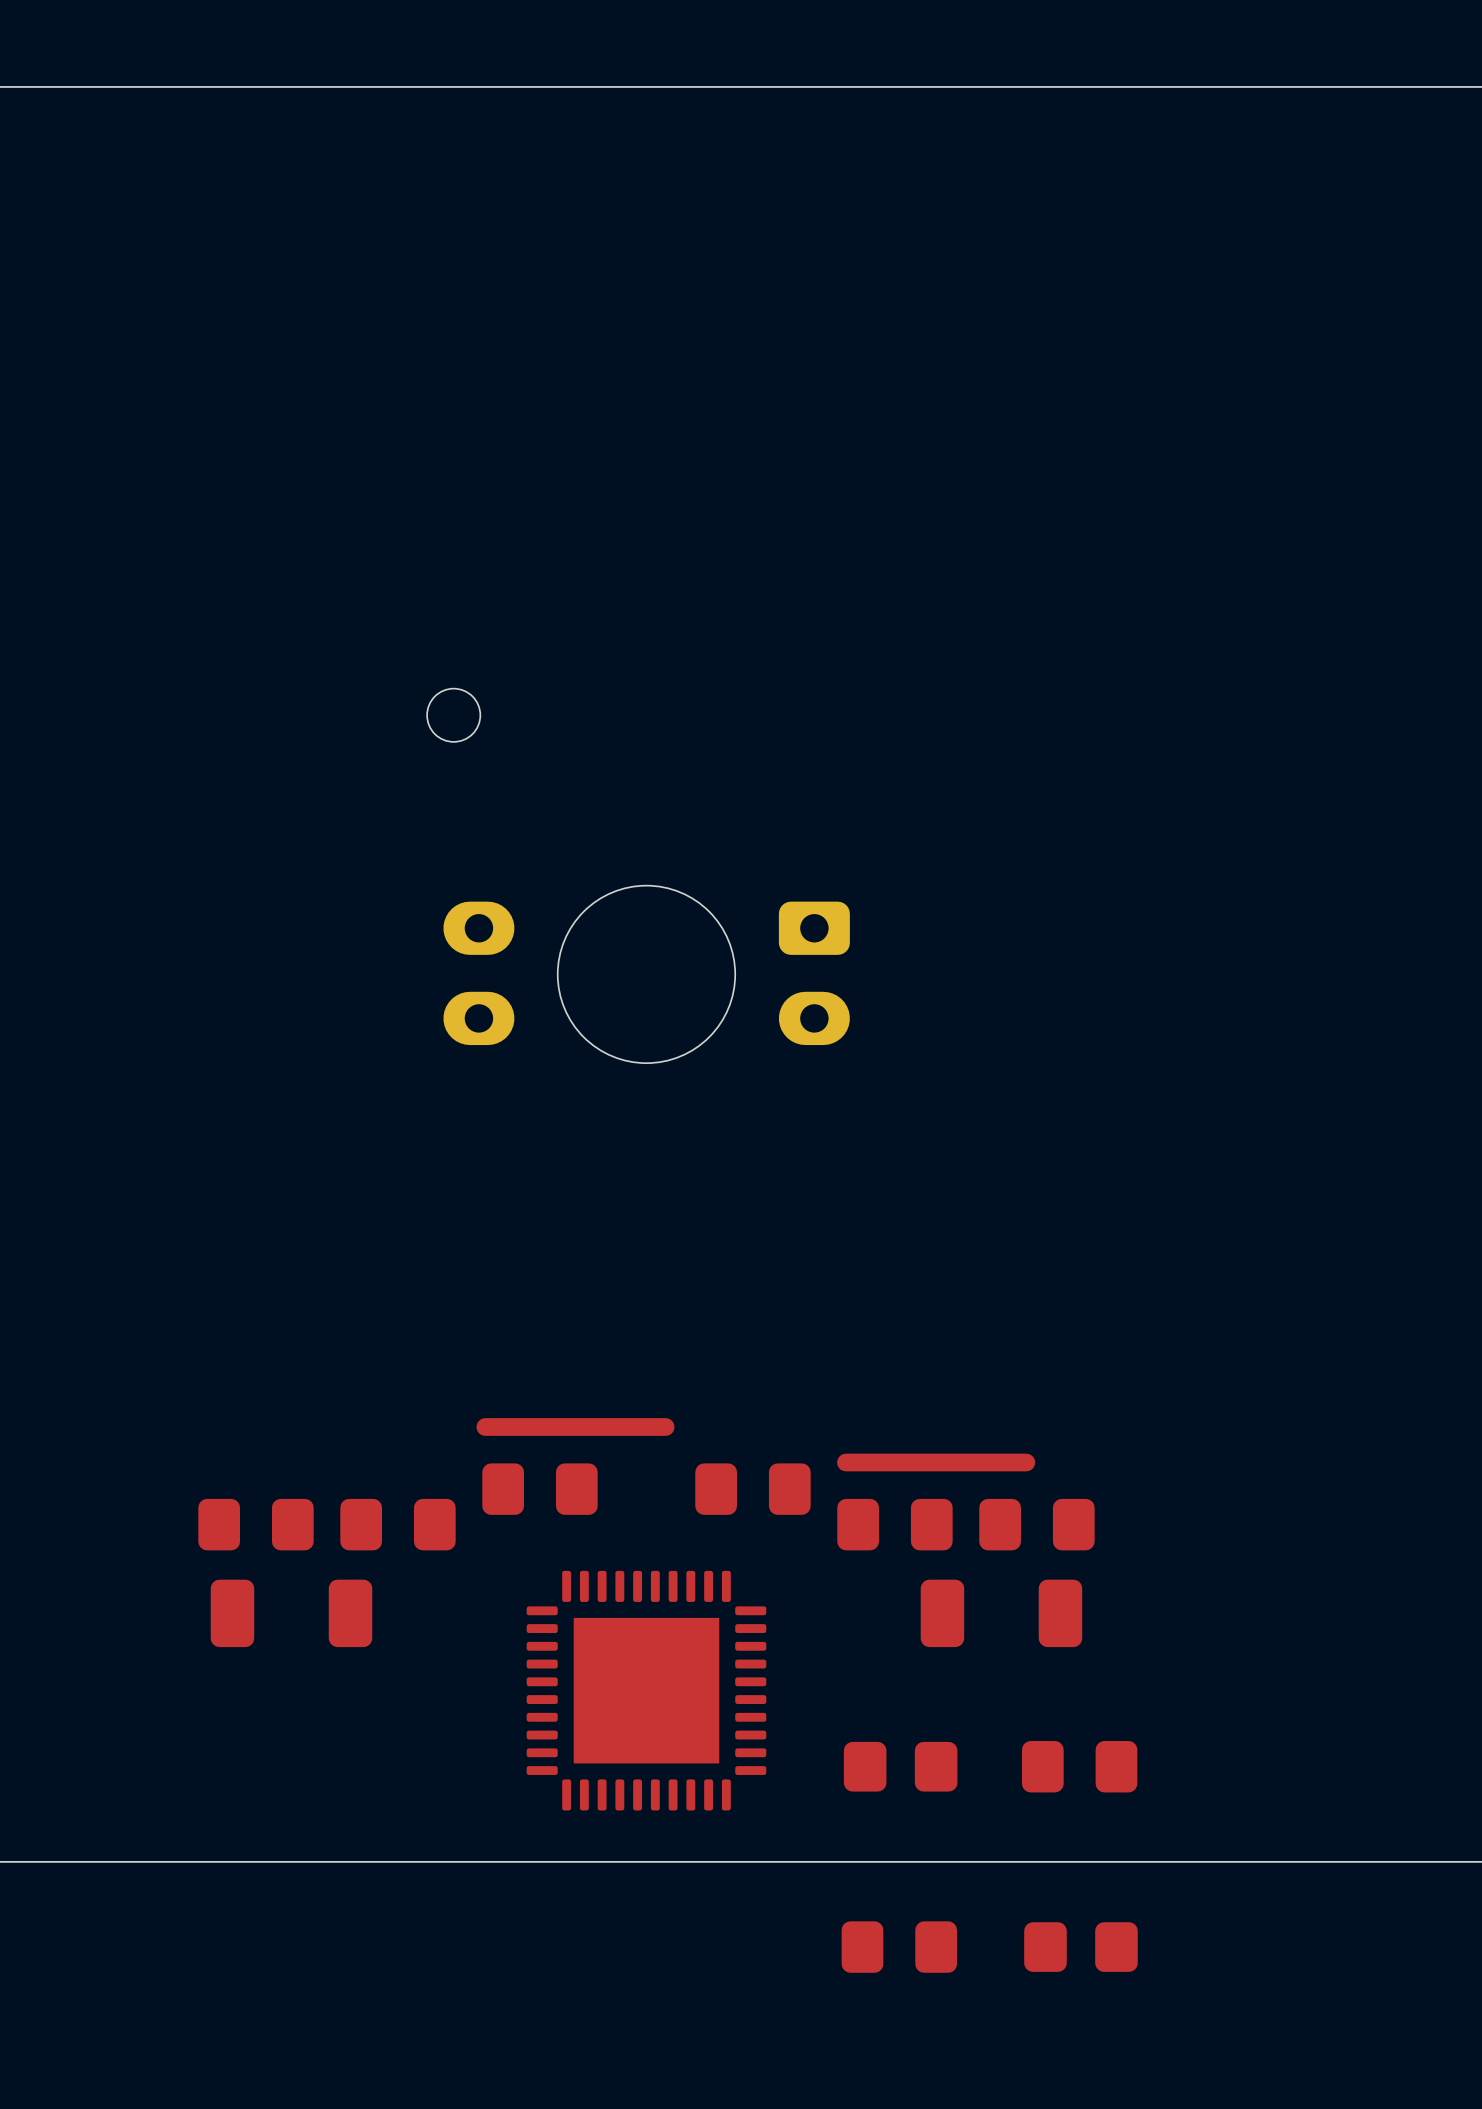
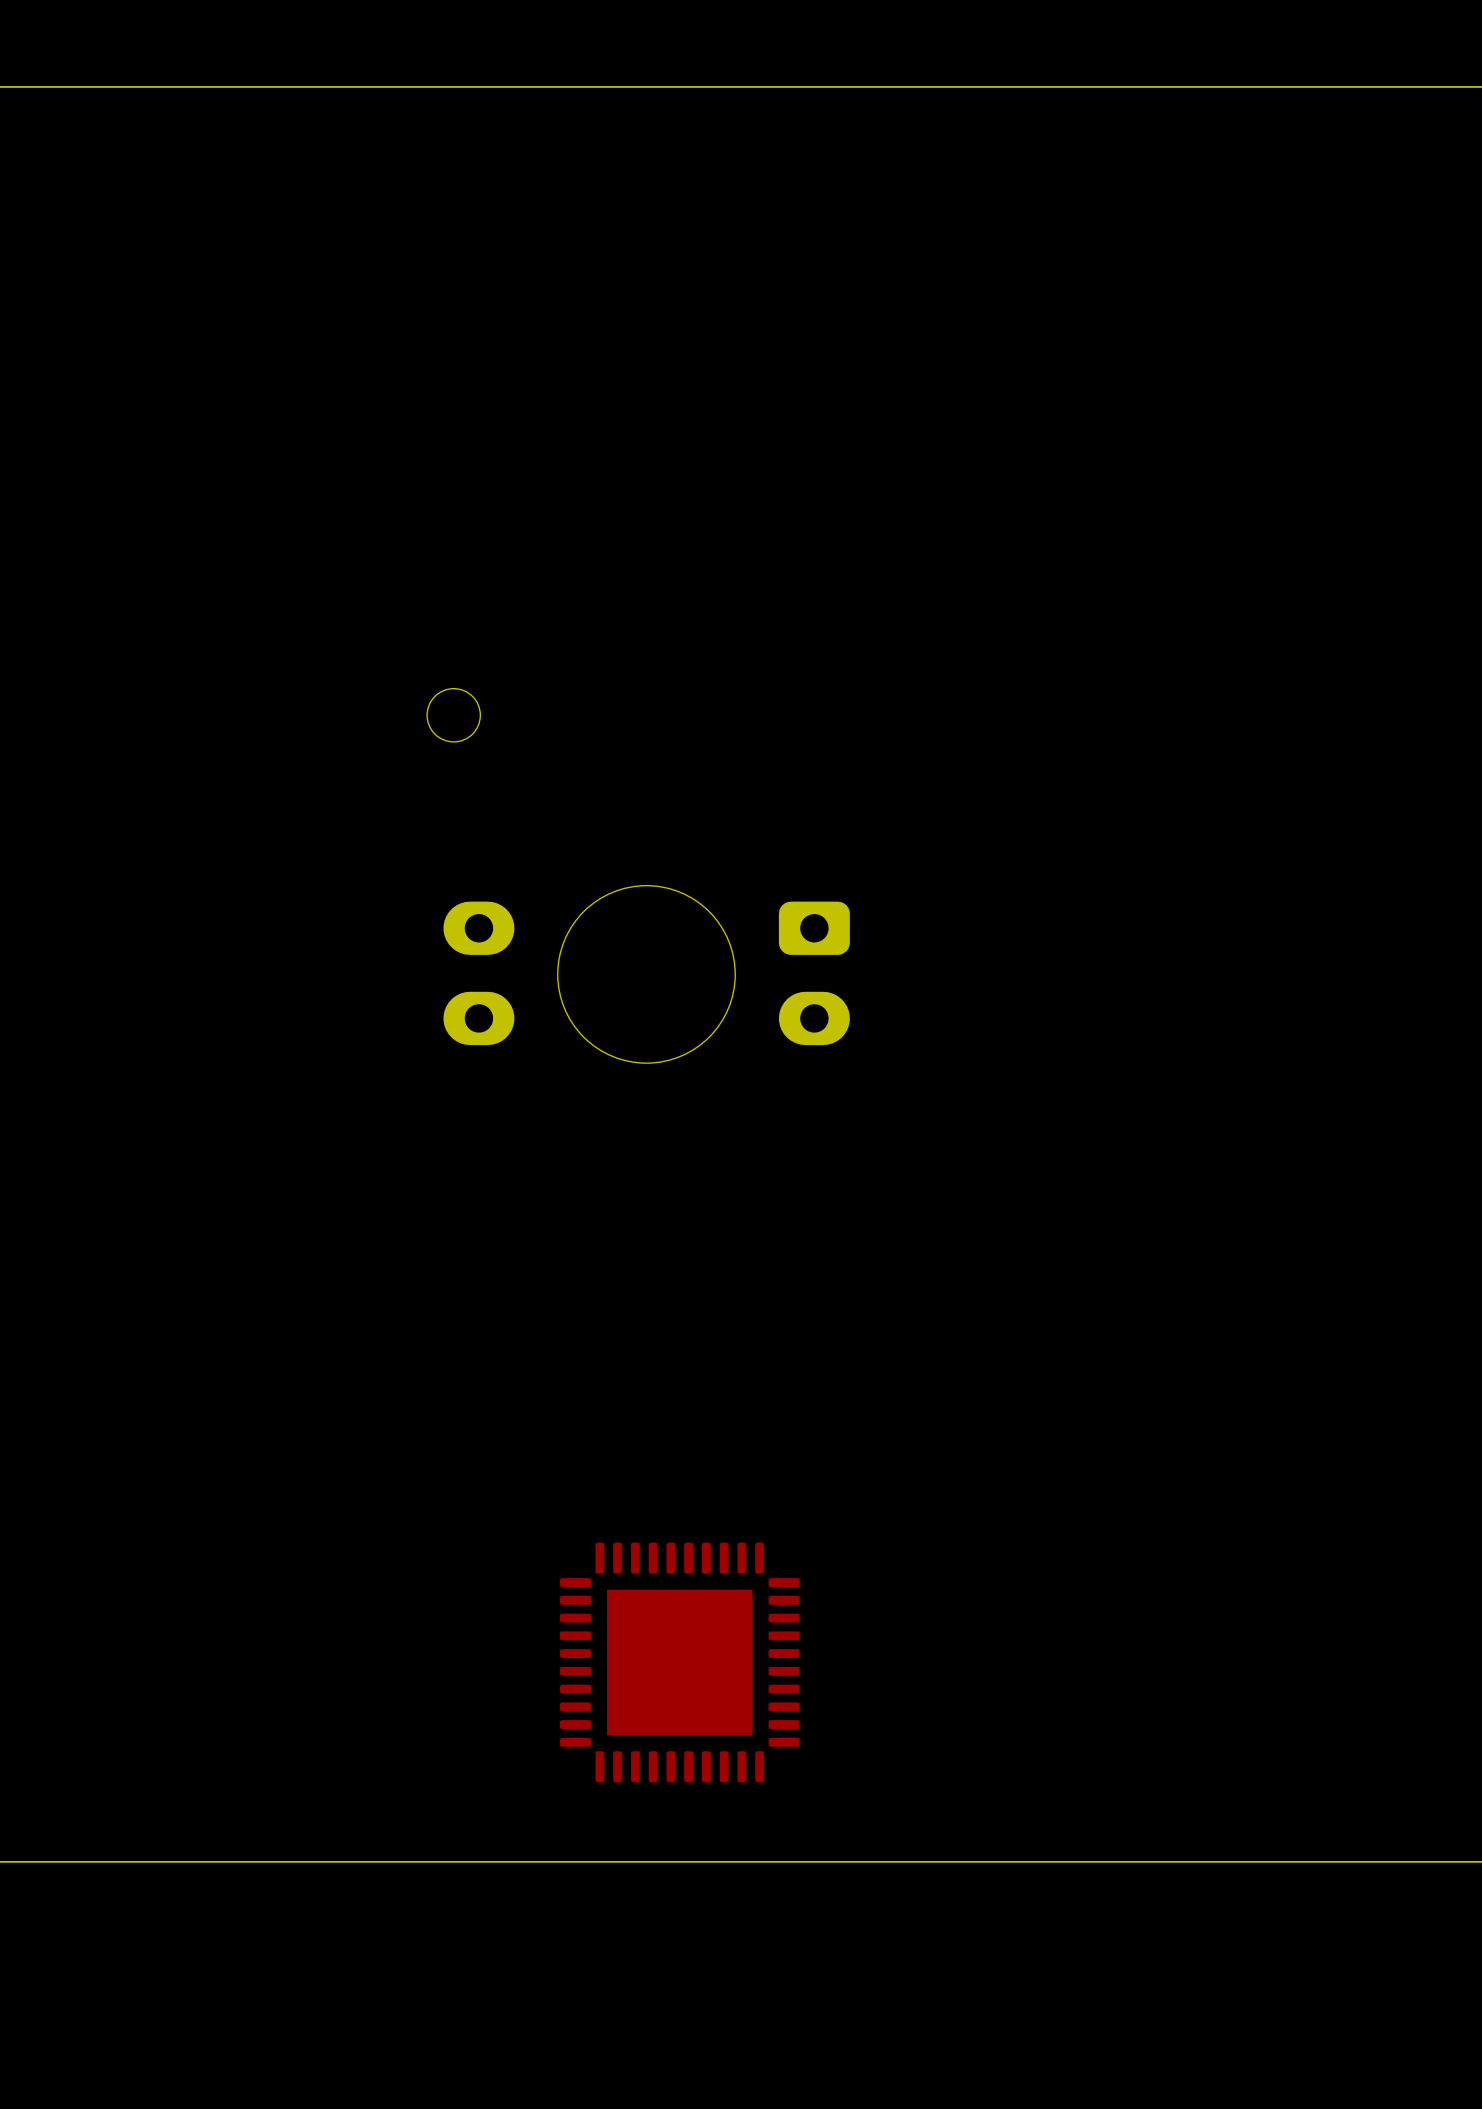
top track: (665, 1427) (485, 1427) -> none
top track: (1026, 1462) (845, 1462) -> none
part: (539, 1489) -> none
part: (752, 1489) -> none
part: (255, 1524) -> none
part: (397, 1524) -> none
part: (894, 1524) -> none
part: (1036, 1524) -> none
part: (291, 1613) -> none
part: (1001, 1613) -> none
part position: (646, 1690) -> (679, 1662)
part: (900, 1766) -> none
part: (1079, 1766) -> none
part: (899, 1947) -> none
part: (1080, 1947) -> none

